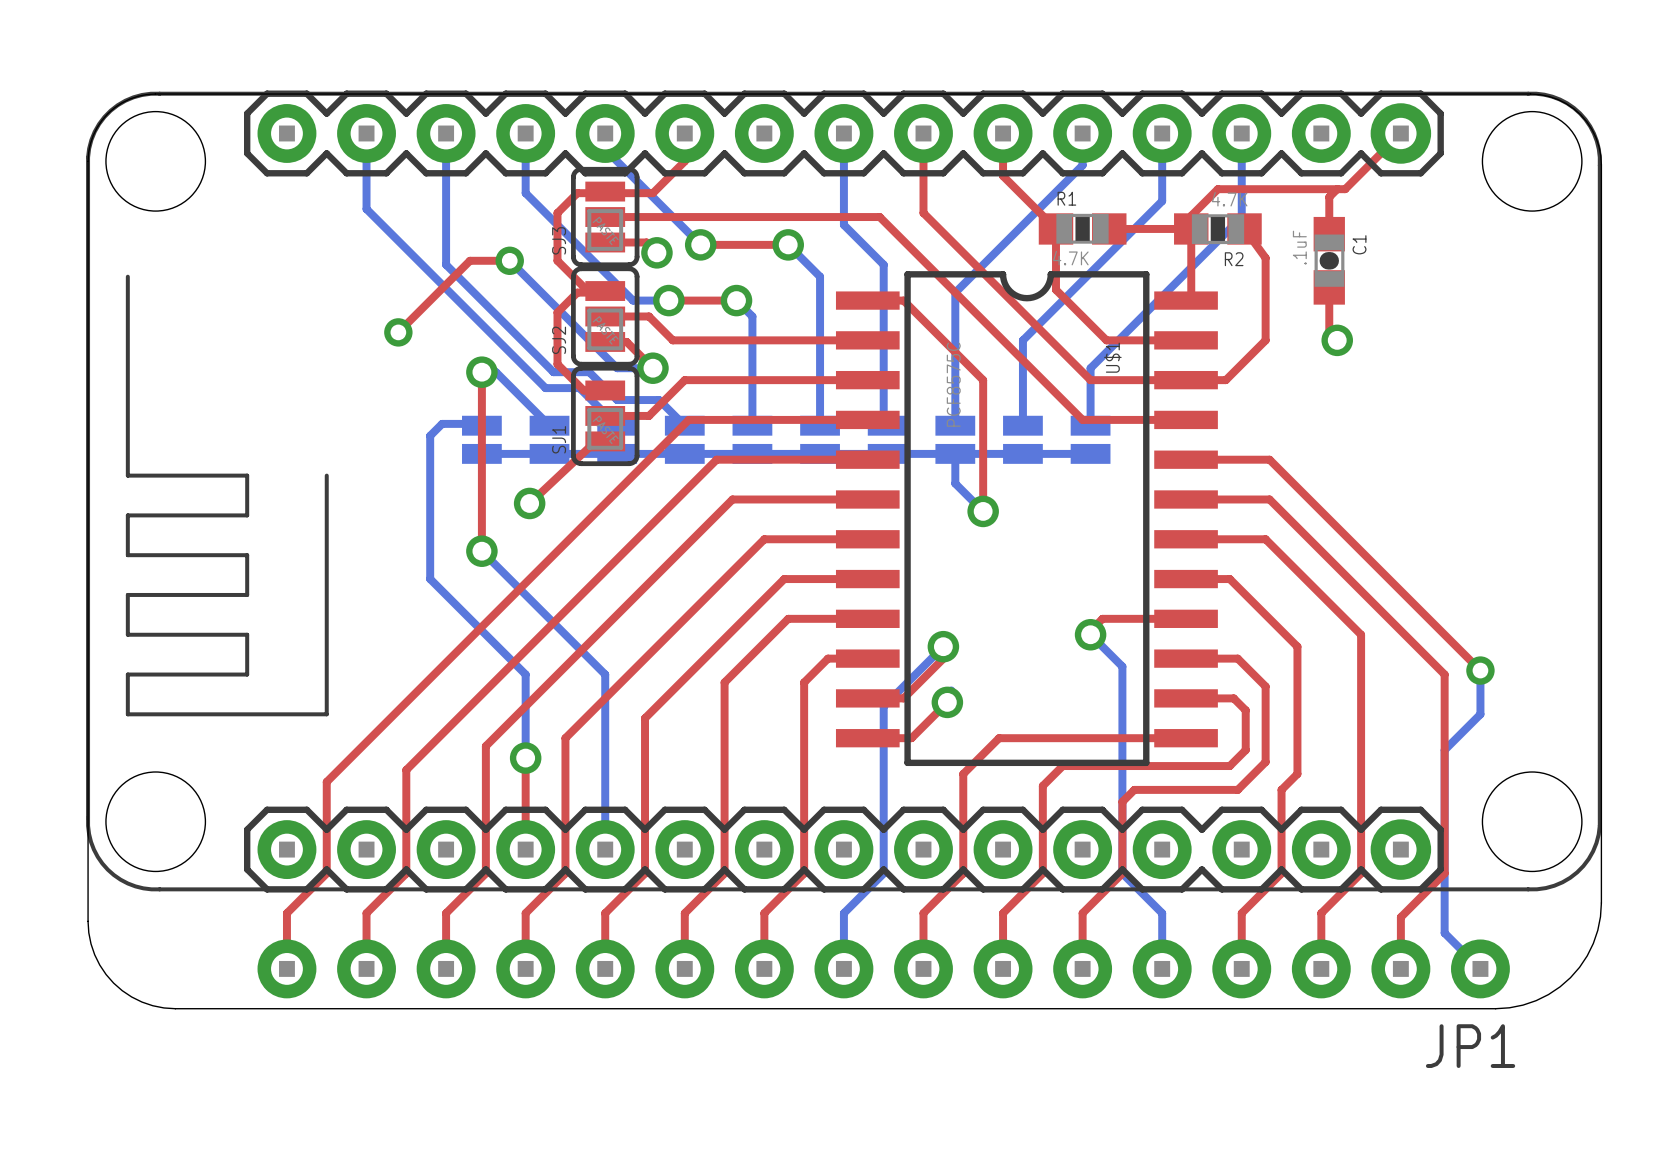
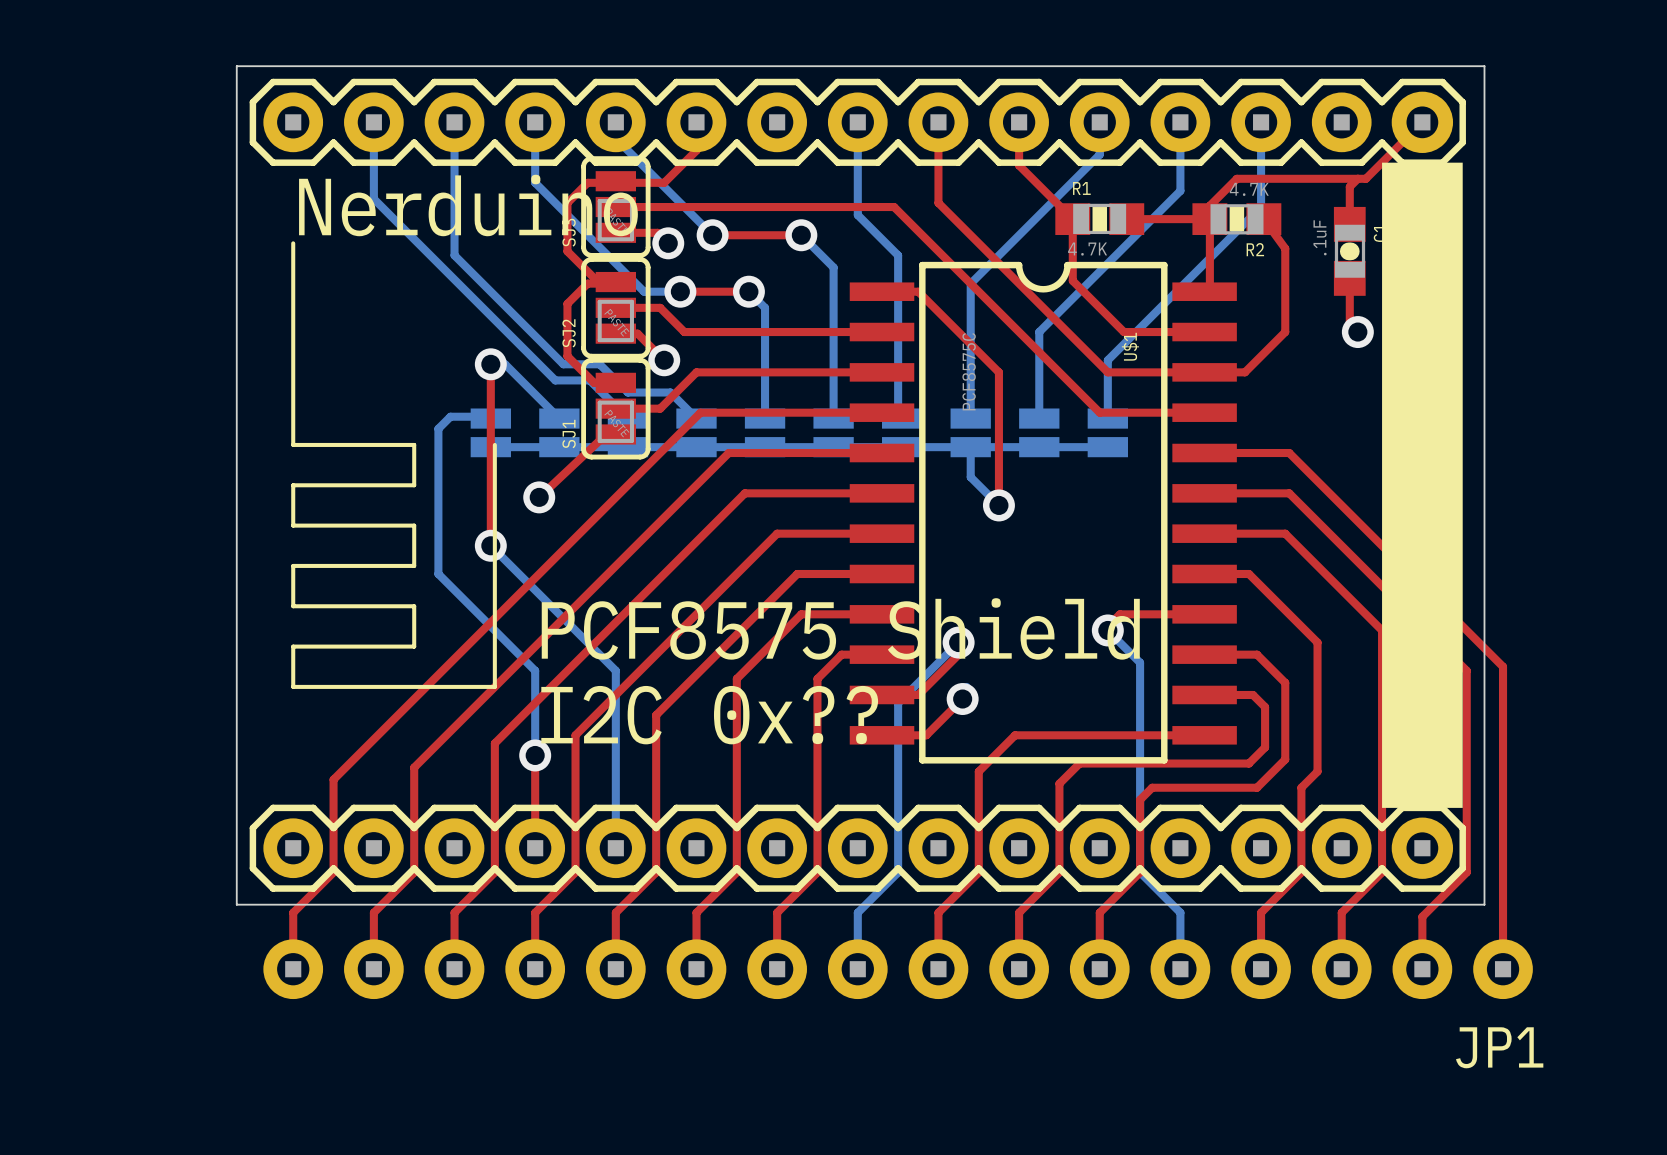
part footprint: [86, 90, 1602, 893] -> [249, 78, 1466, 892]
board edge: (155, 94) (1530, 94) (1548, 96) (1565, 103) (1580, 114) (1591, 129) (1598, 146) (1601, 164) (1601, 903) (1597, 930) (1587, 955) (1570, 977) (1548, 994) (1523, 1005) (1495, 1008) (175, 1008) (152, 1005) (131, 997) (113, 983) (99, 965) (91, 943) (88, 921) (88, 161) (93, 135) (107, 113) (129, 99) (155, 94) -> (236, 66) (236, 904) (1484, 904) (1484, 66) (236, 66)
text: none -> Nerduino (468, 205)
top track: (509, 260) (469, 260) (398, 332) -> none
bottom track: (509, 260) (617, 368) (652, 368) -> none
via: (509, 260) -> none
via: (398, 332) -> none
text: none -> PCF8575 Shield (840, 628)
top track: none -> (1503, 666) (1503, 969)
bottom track: (1480, 670) (1480, 714) (1444, 750) (1444, 933) (1480, 968) -> none
via: (1480, 670) -> none
text: none -> I2C 0x?? (709, 715)

